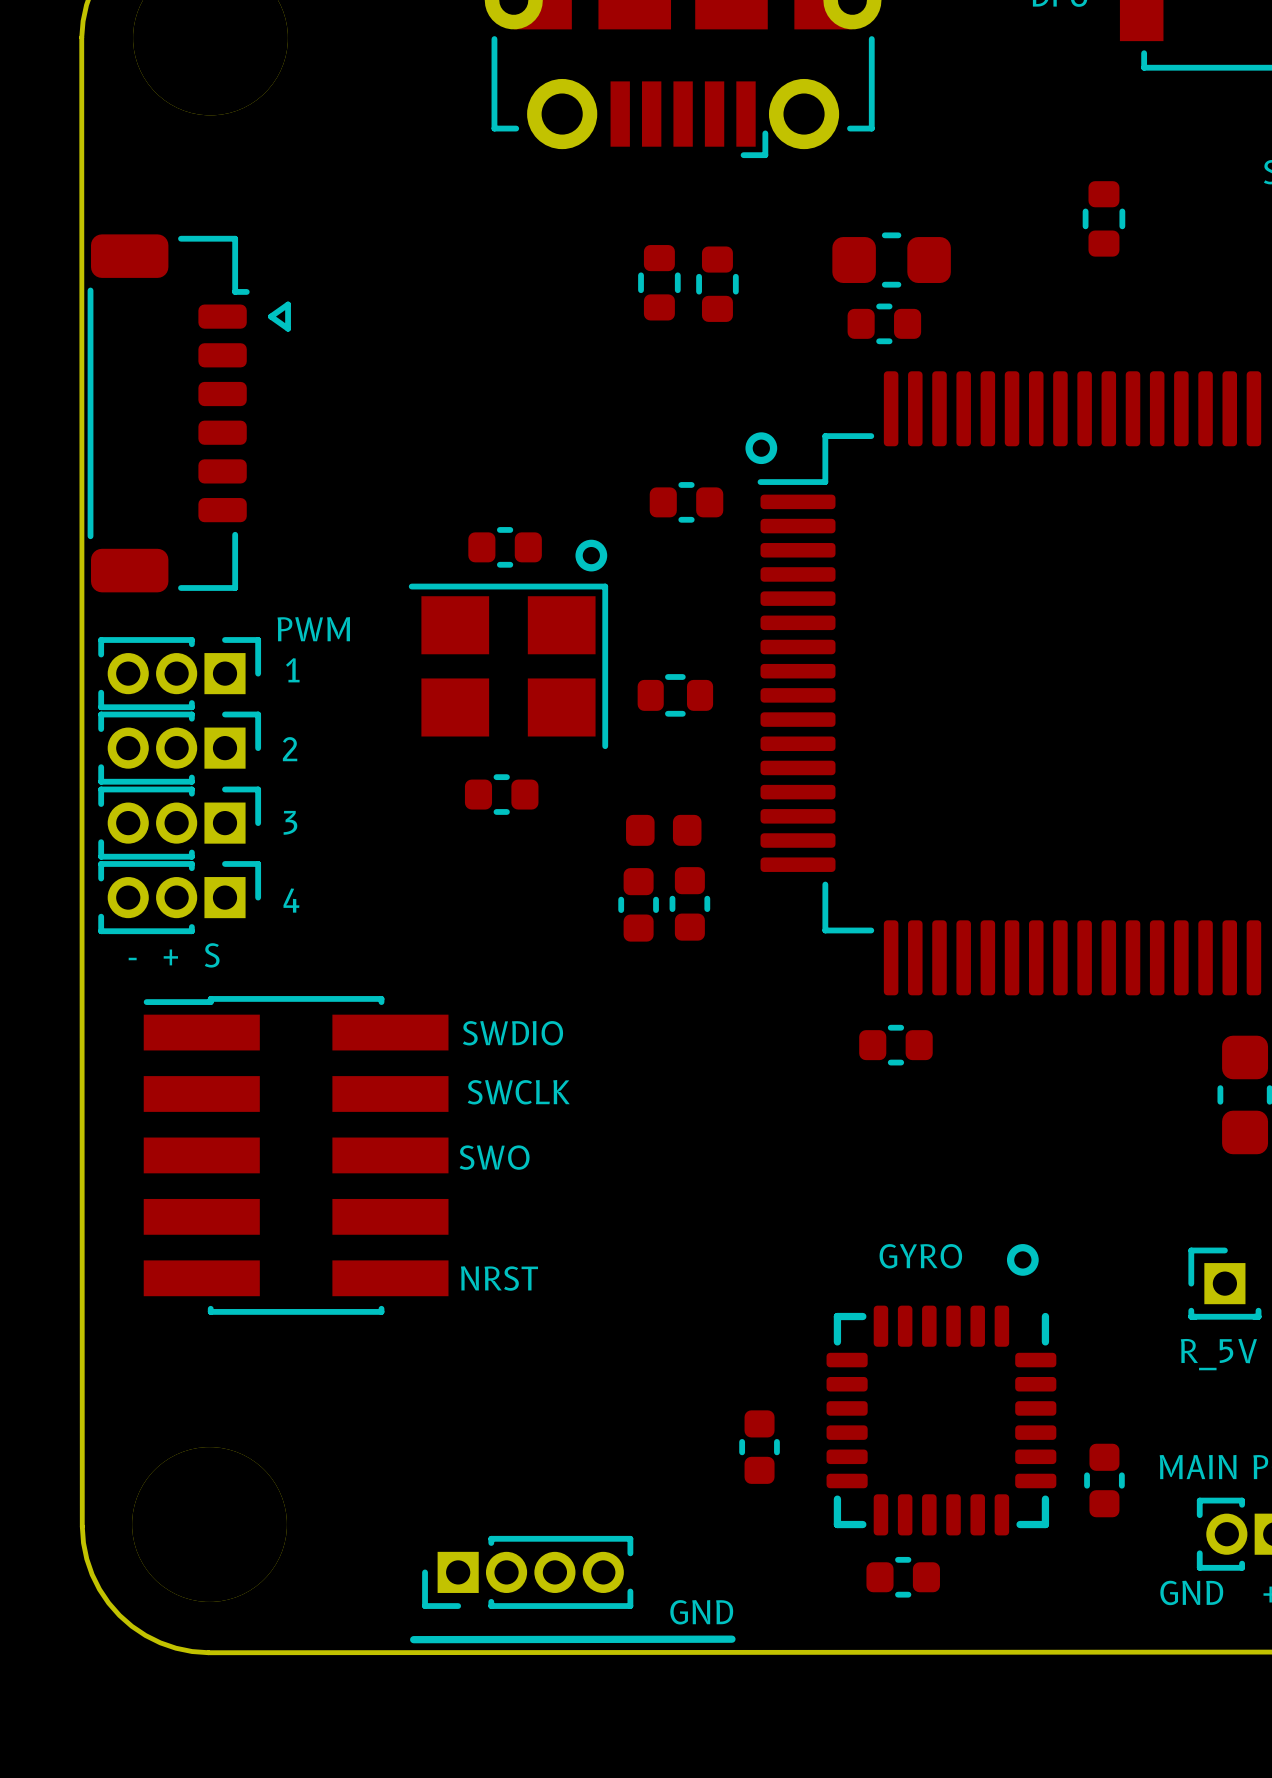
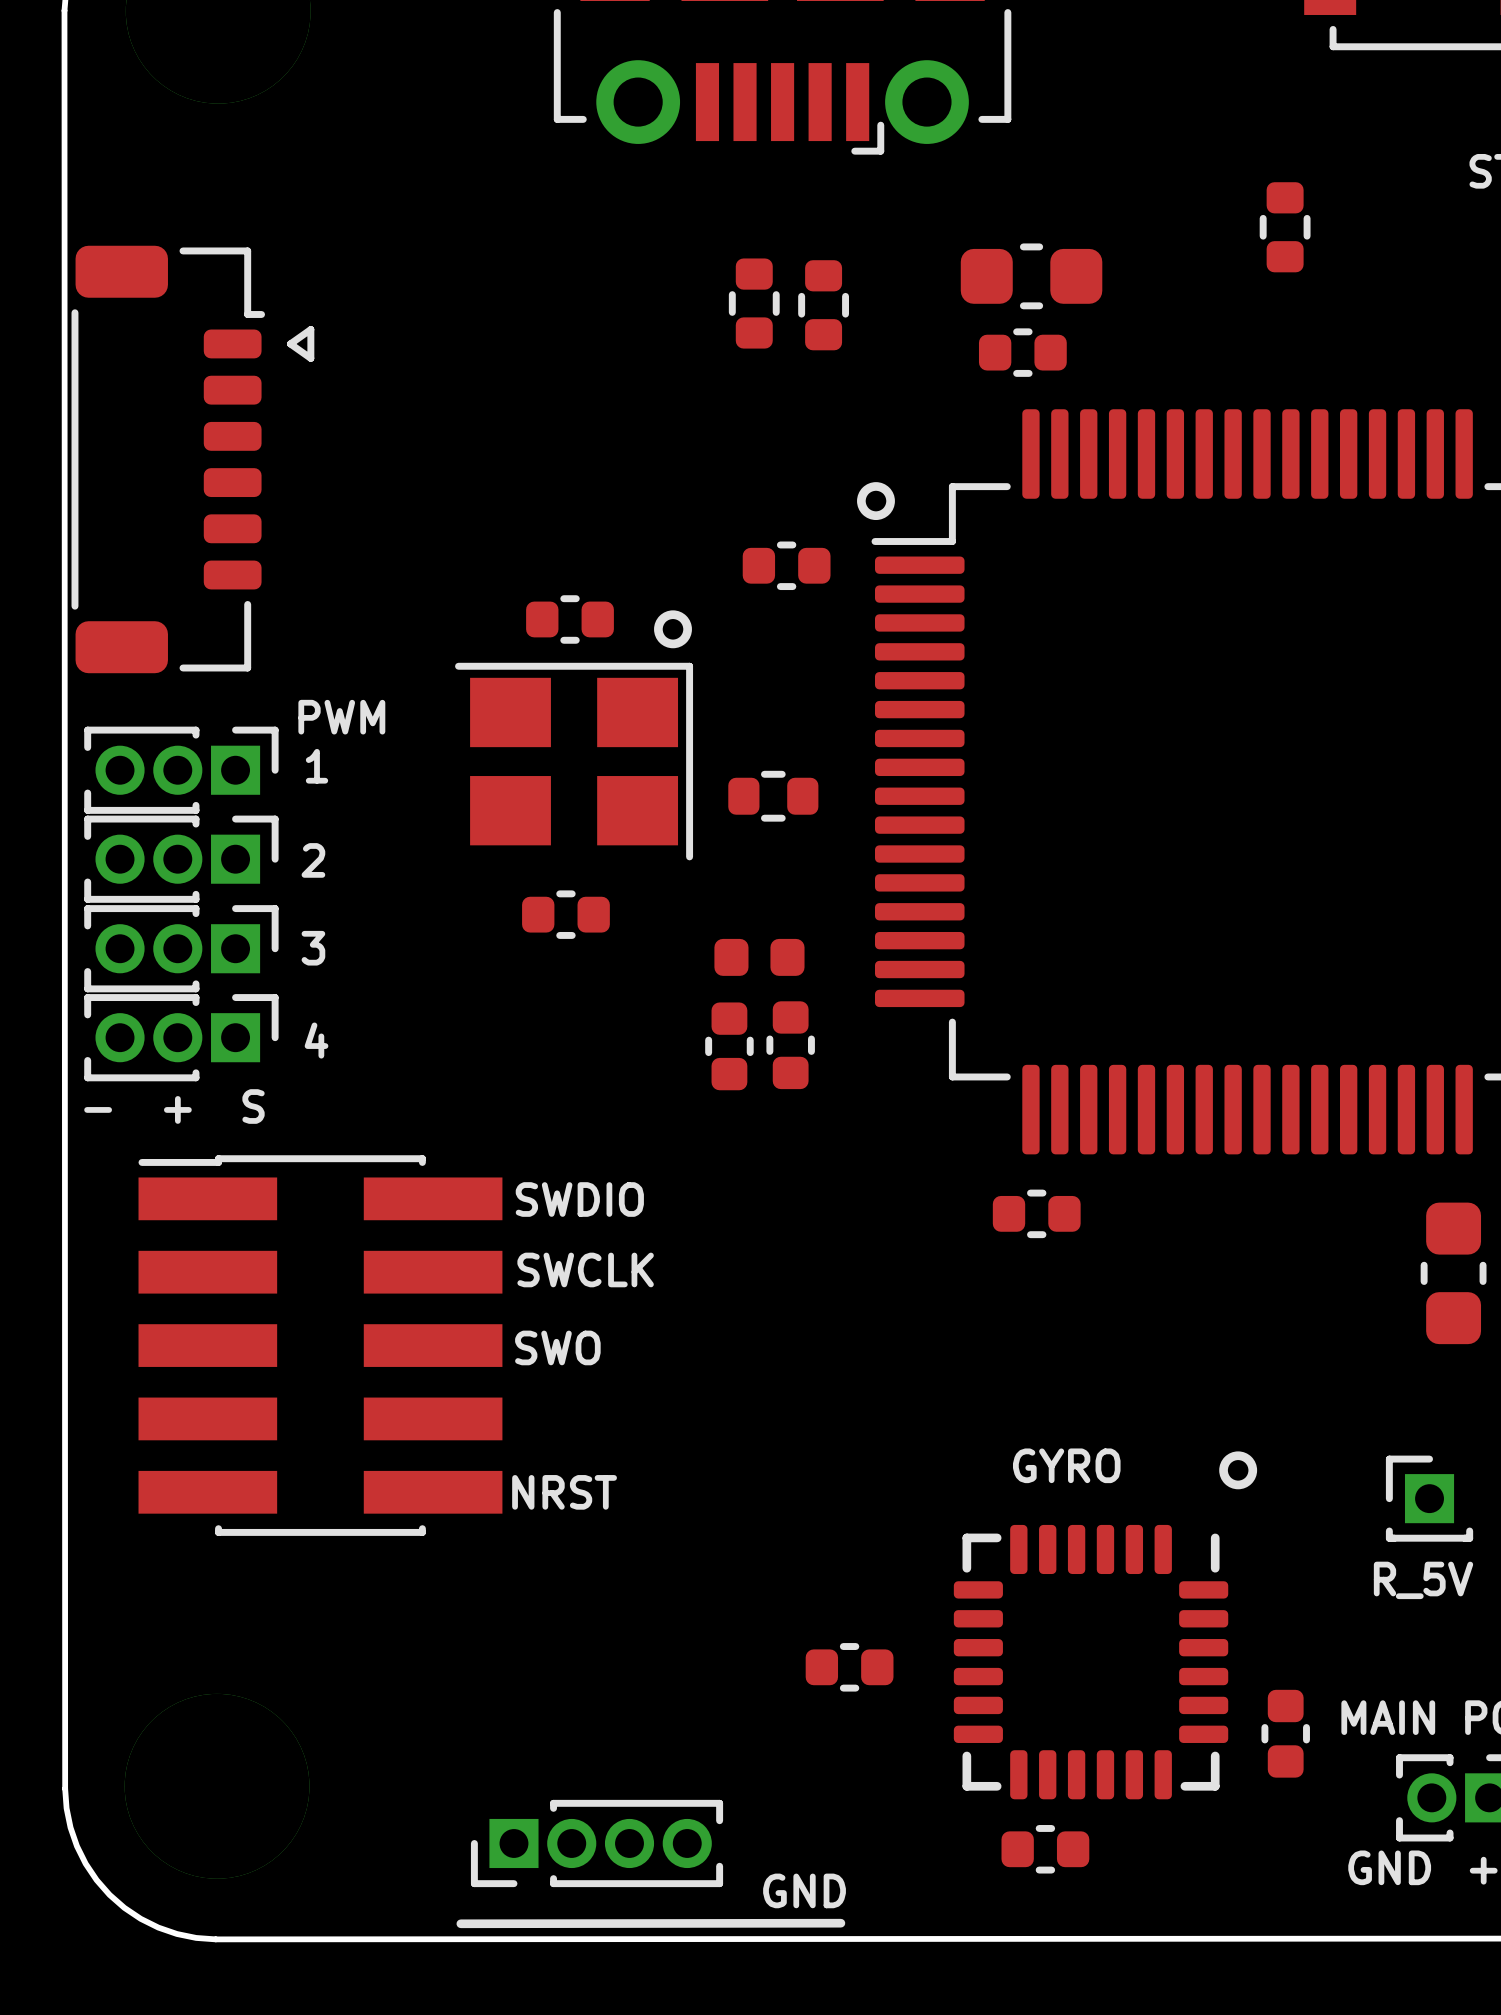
drawing position: (1022, 1259) -> (1238, 1470)
part rotation: 0° (759, 1447) -> 90° clockwise (849, 1667)

